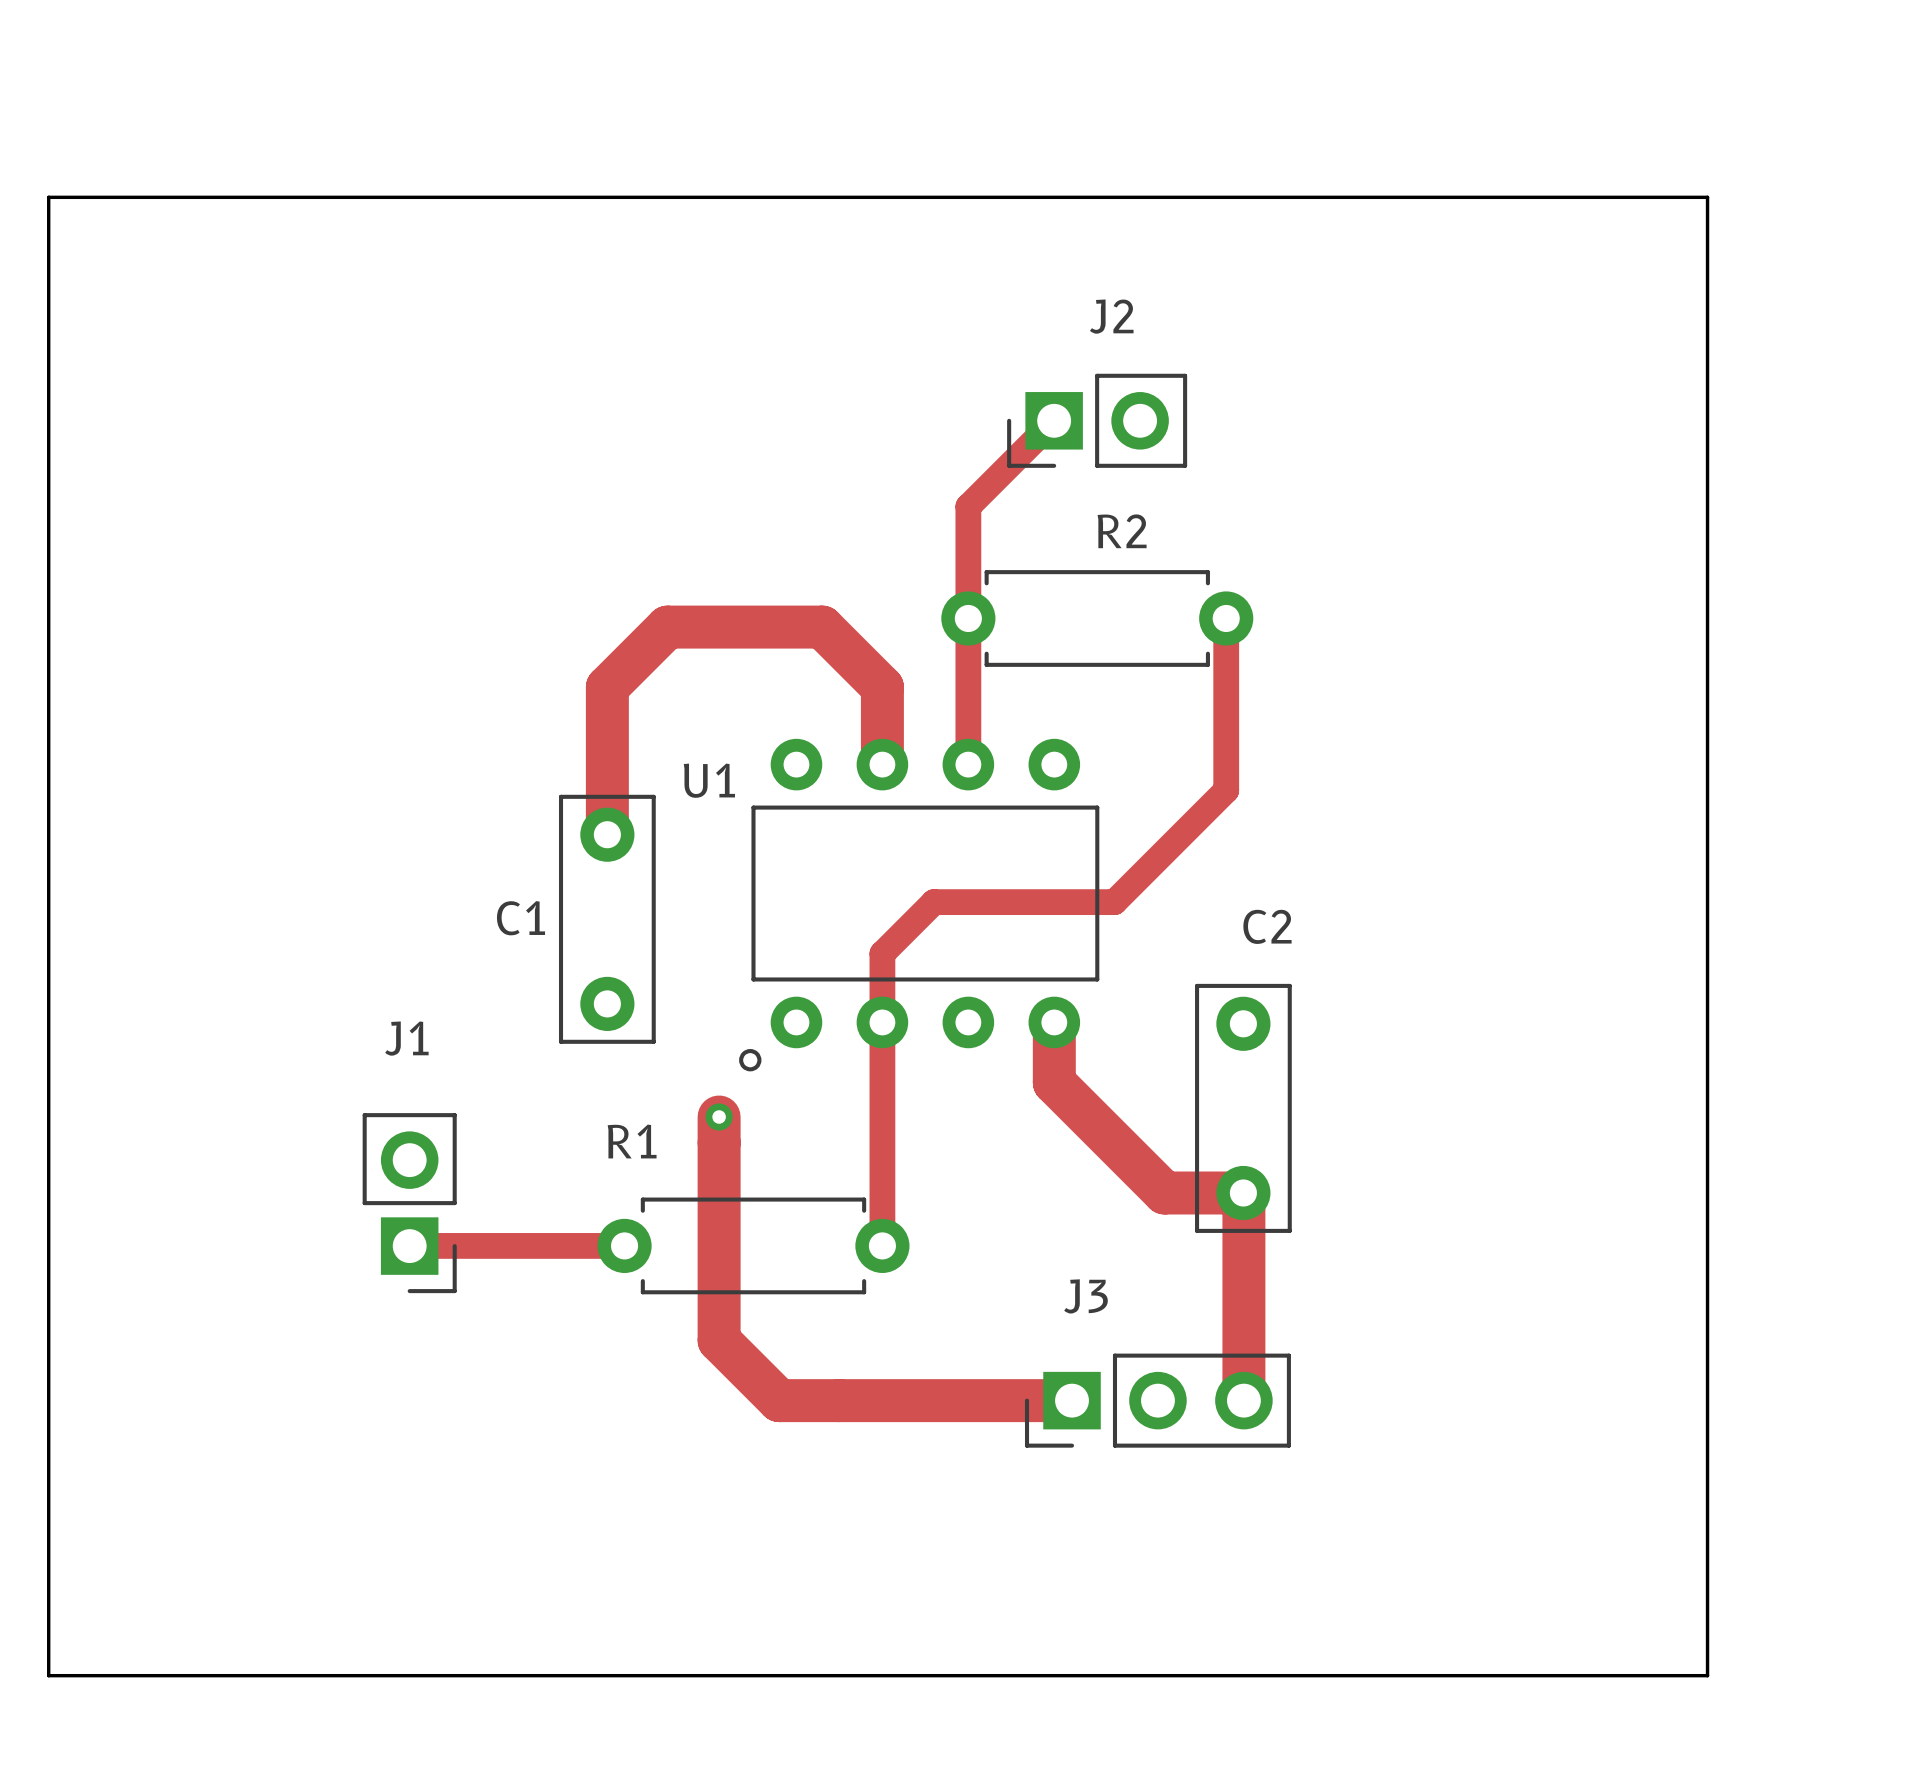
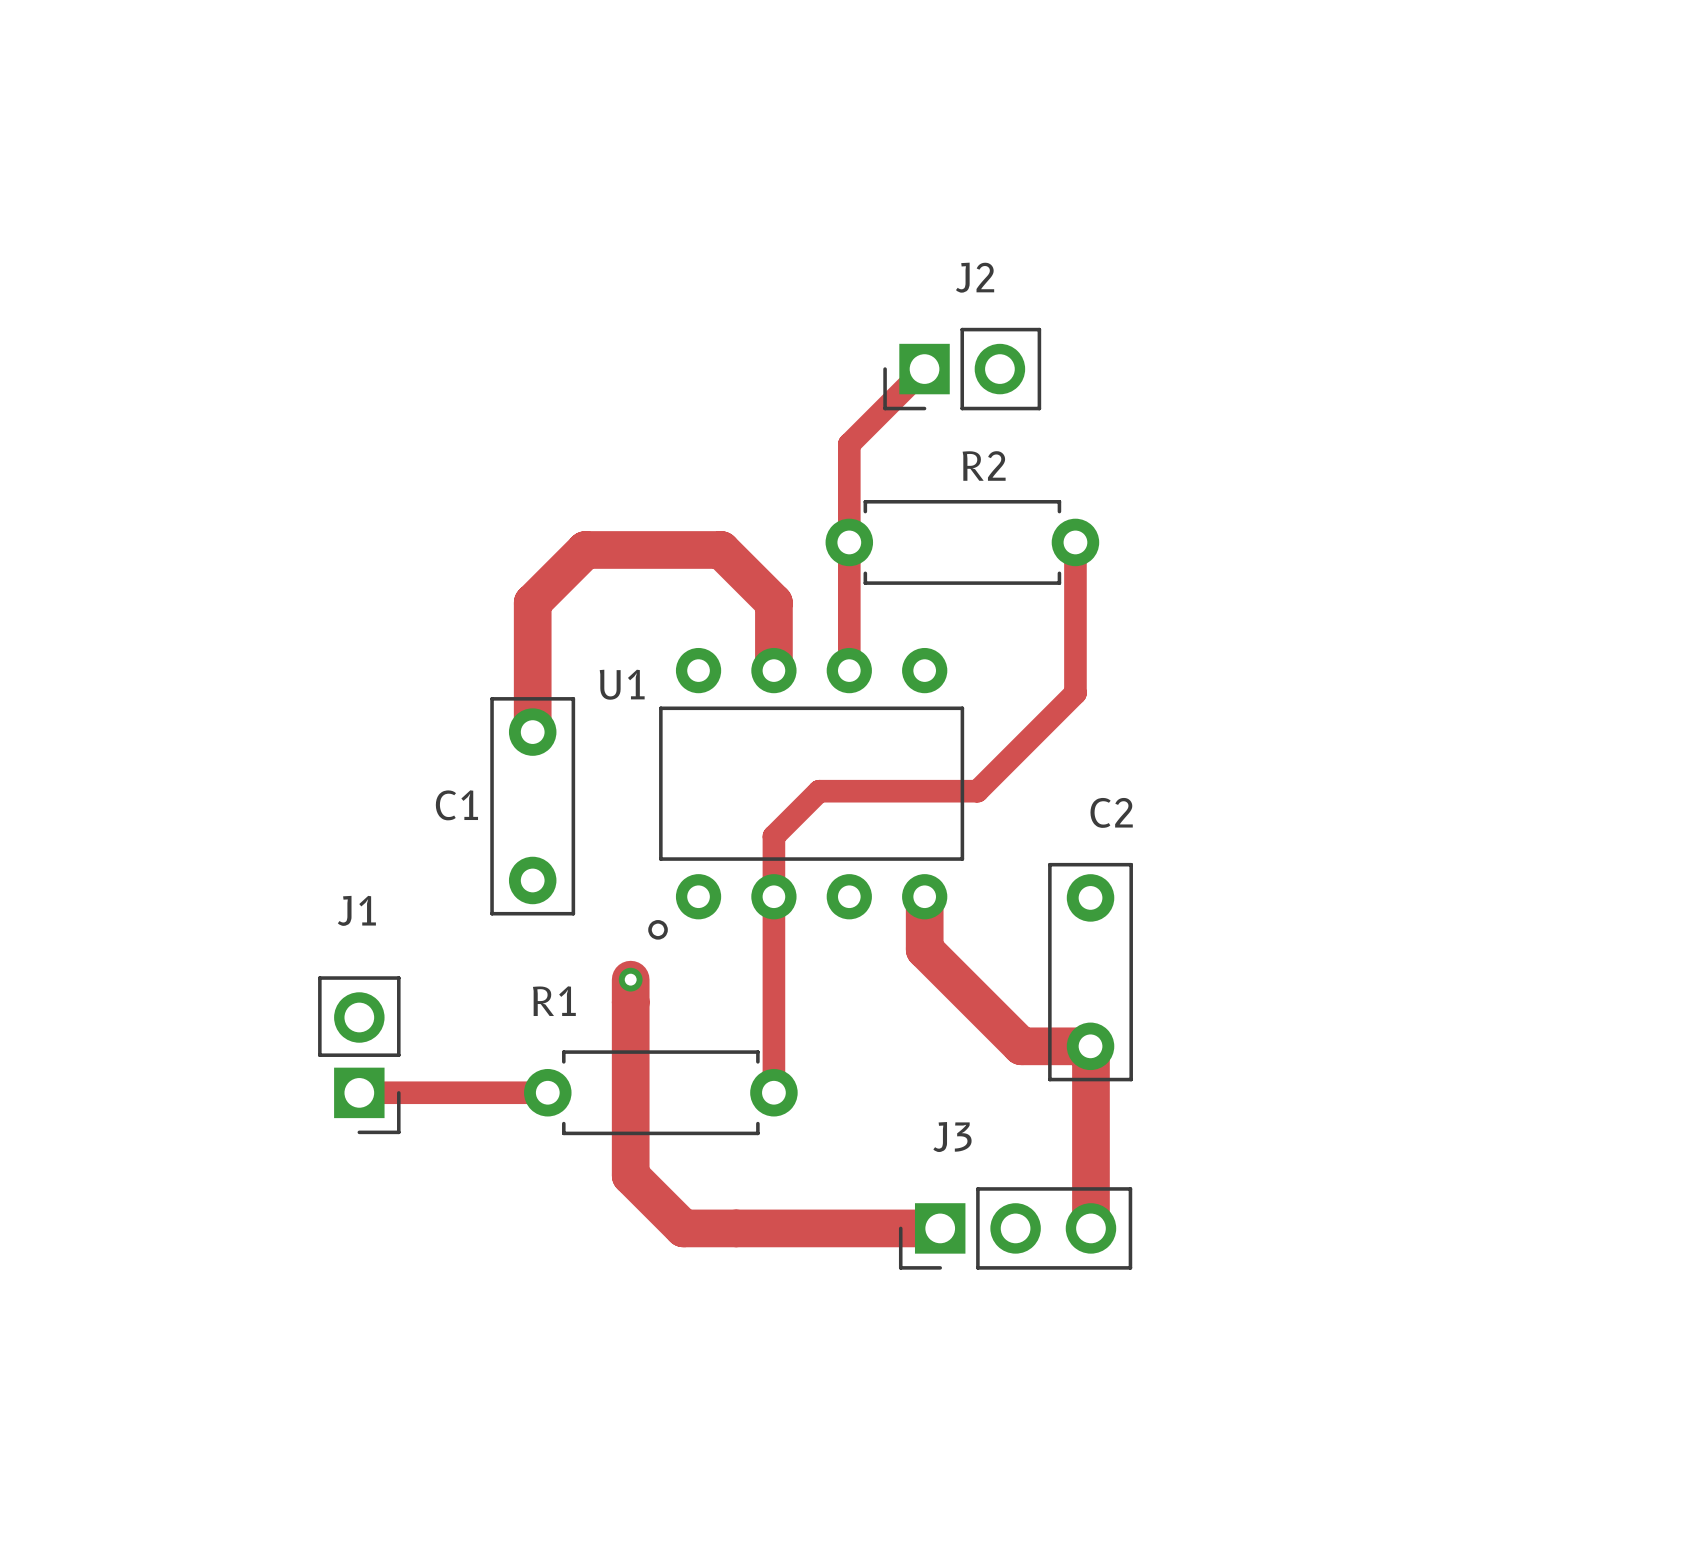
board edge: (48, 197) (1707, 197) (1707, 1675) (48, 1675) (48, 197) -> none

